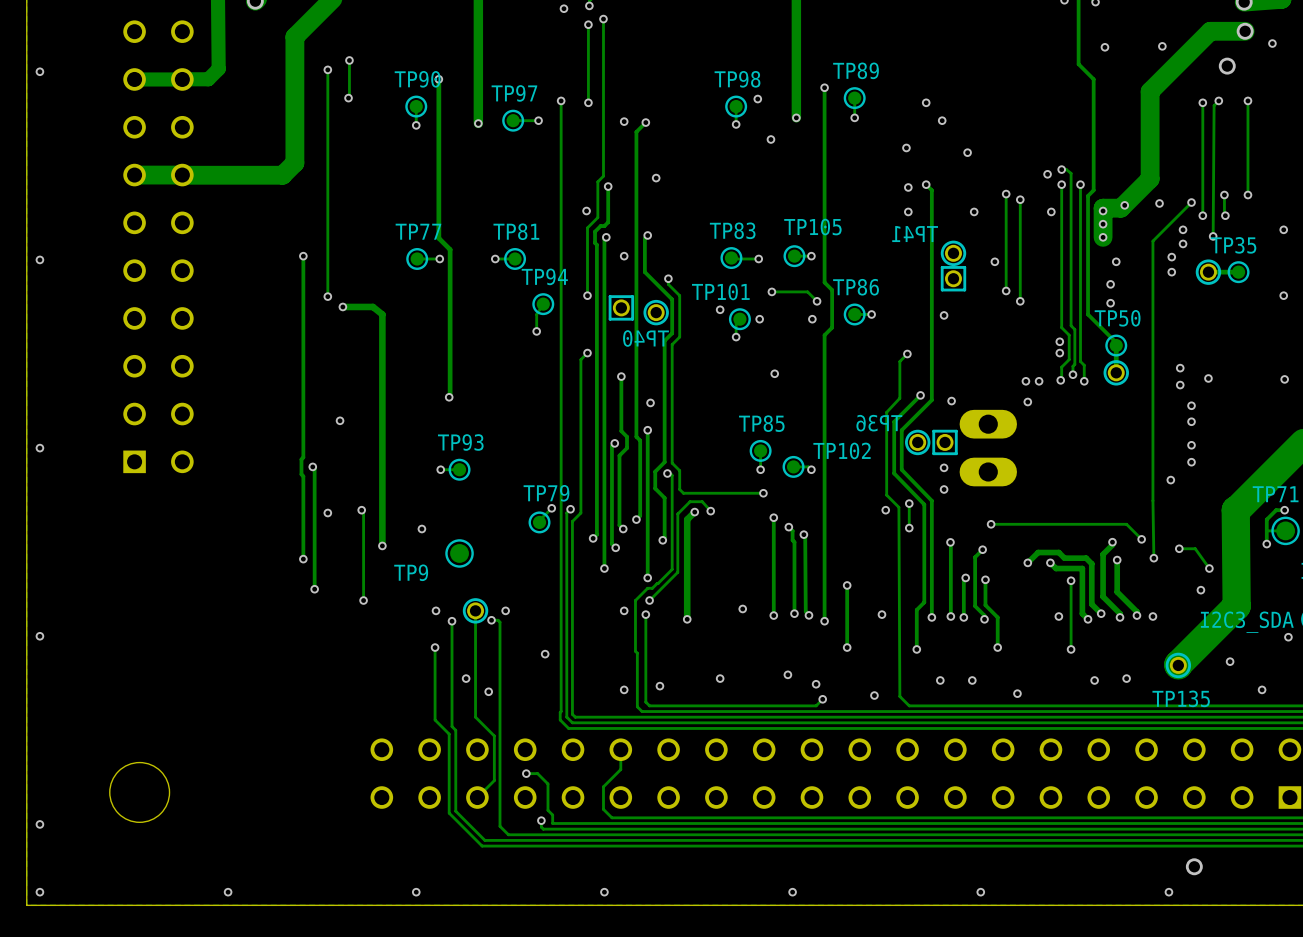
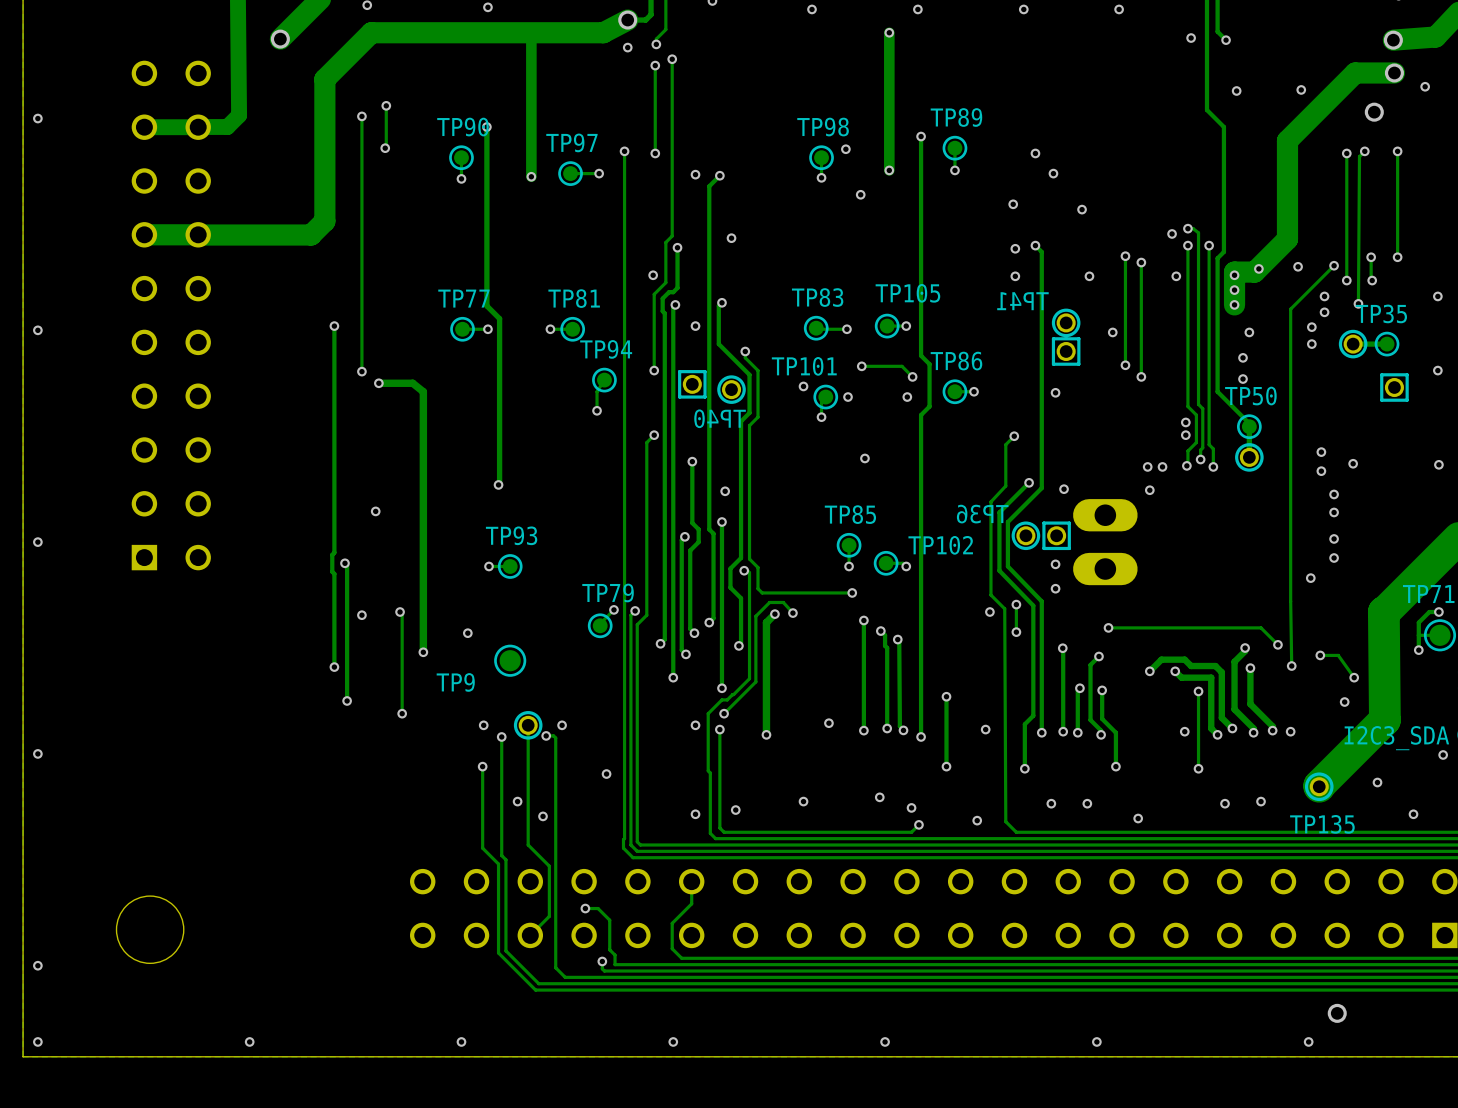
part: none -> (1394, 387)

